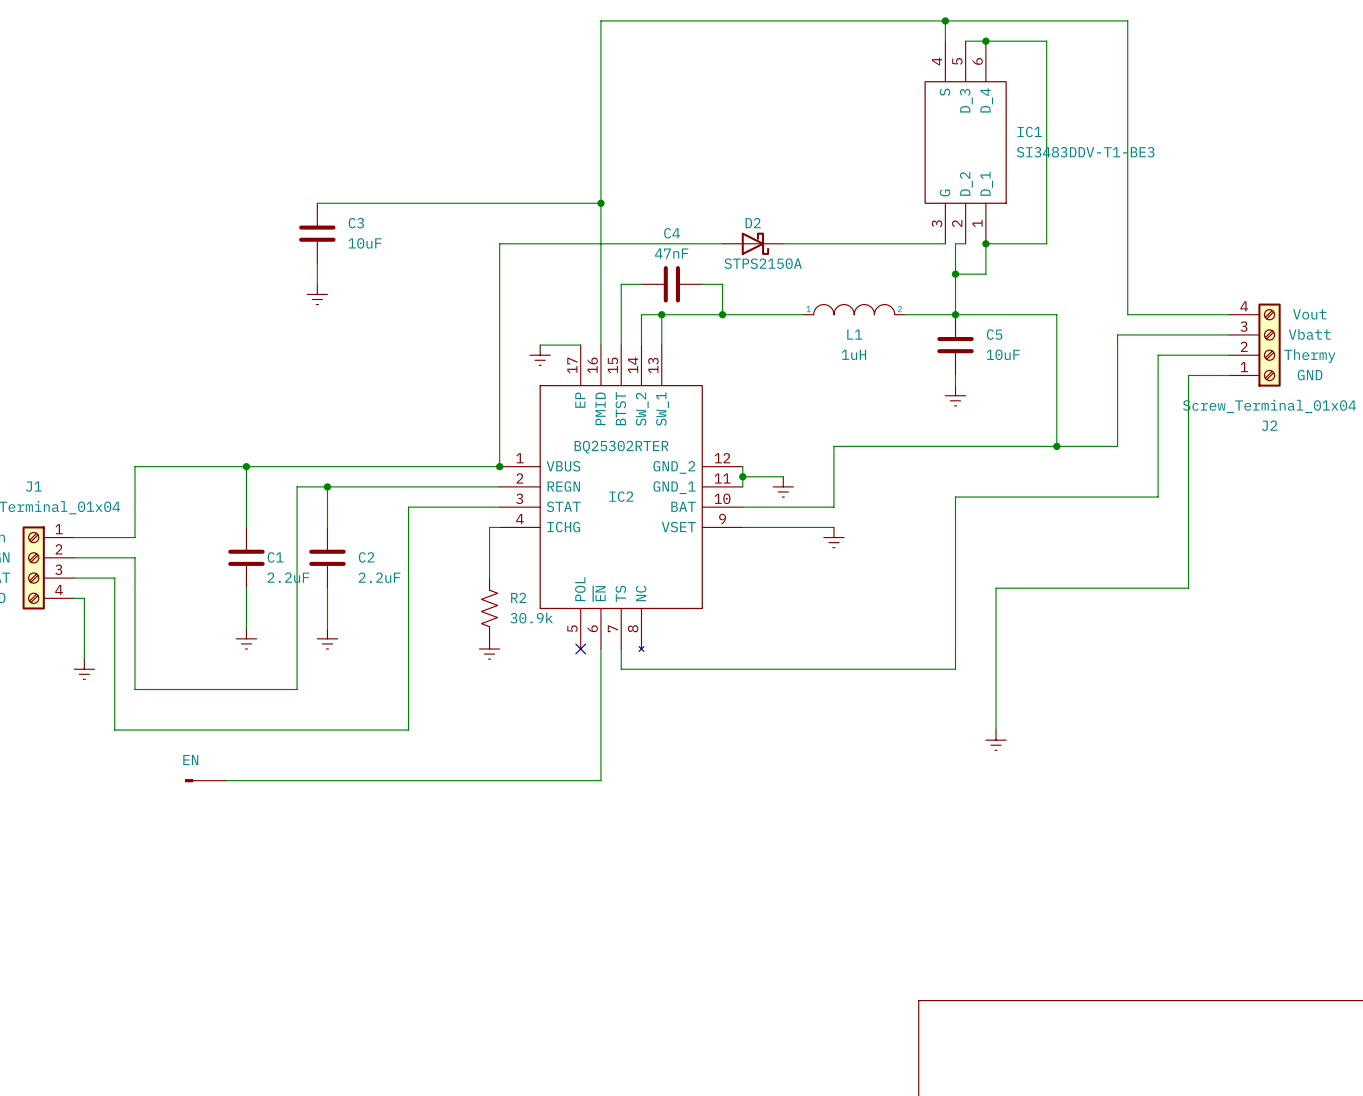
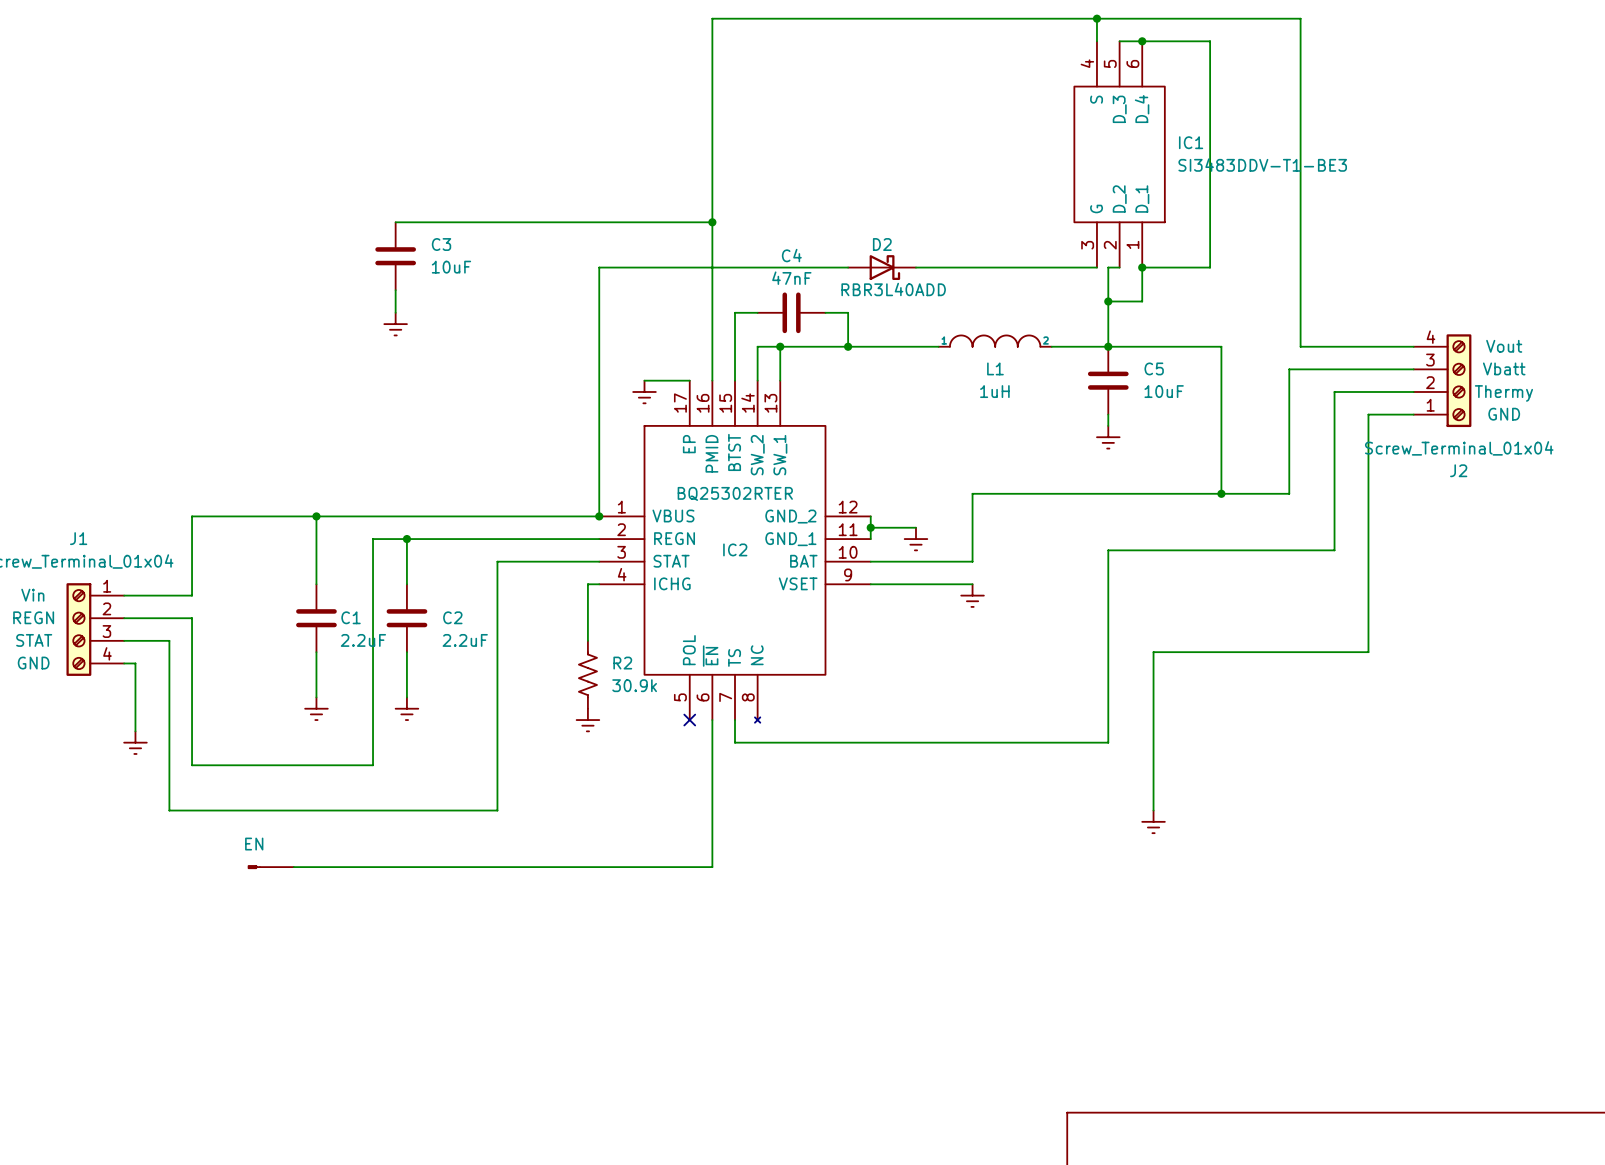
D2 value: STPS2150A (763, 263) -> RBR3L40ADD (893, 289)

